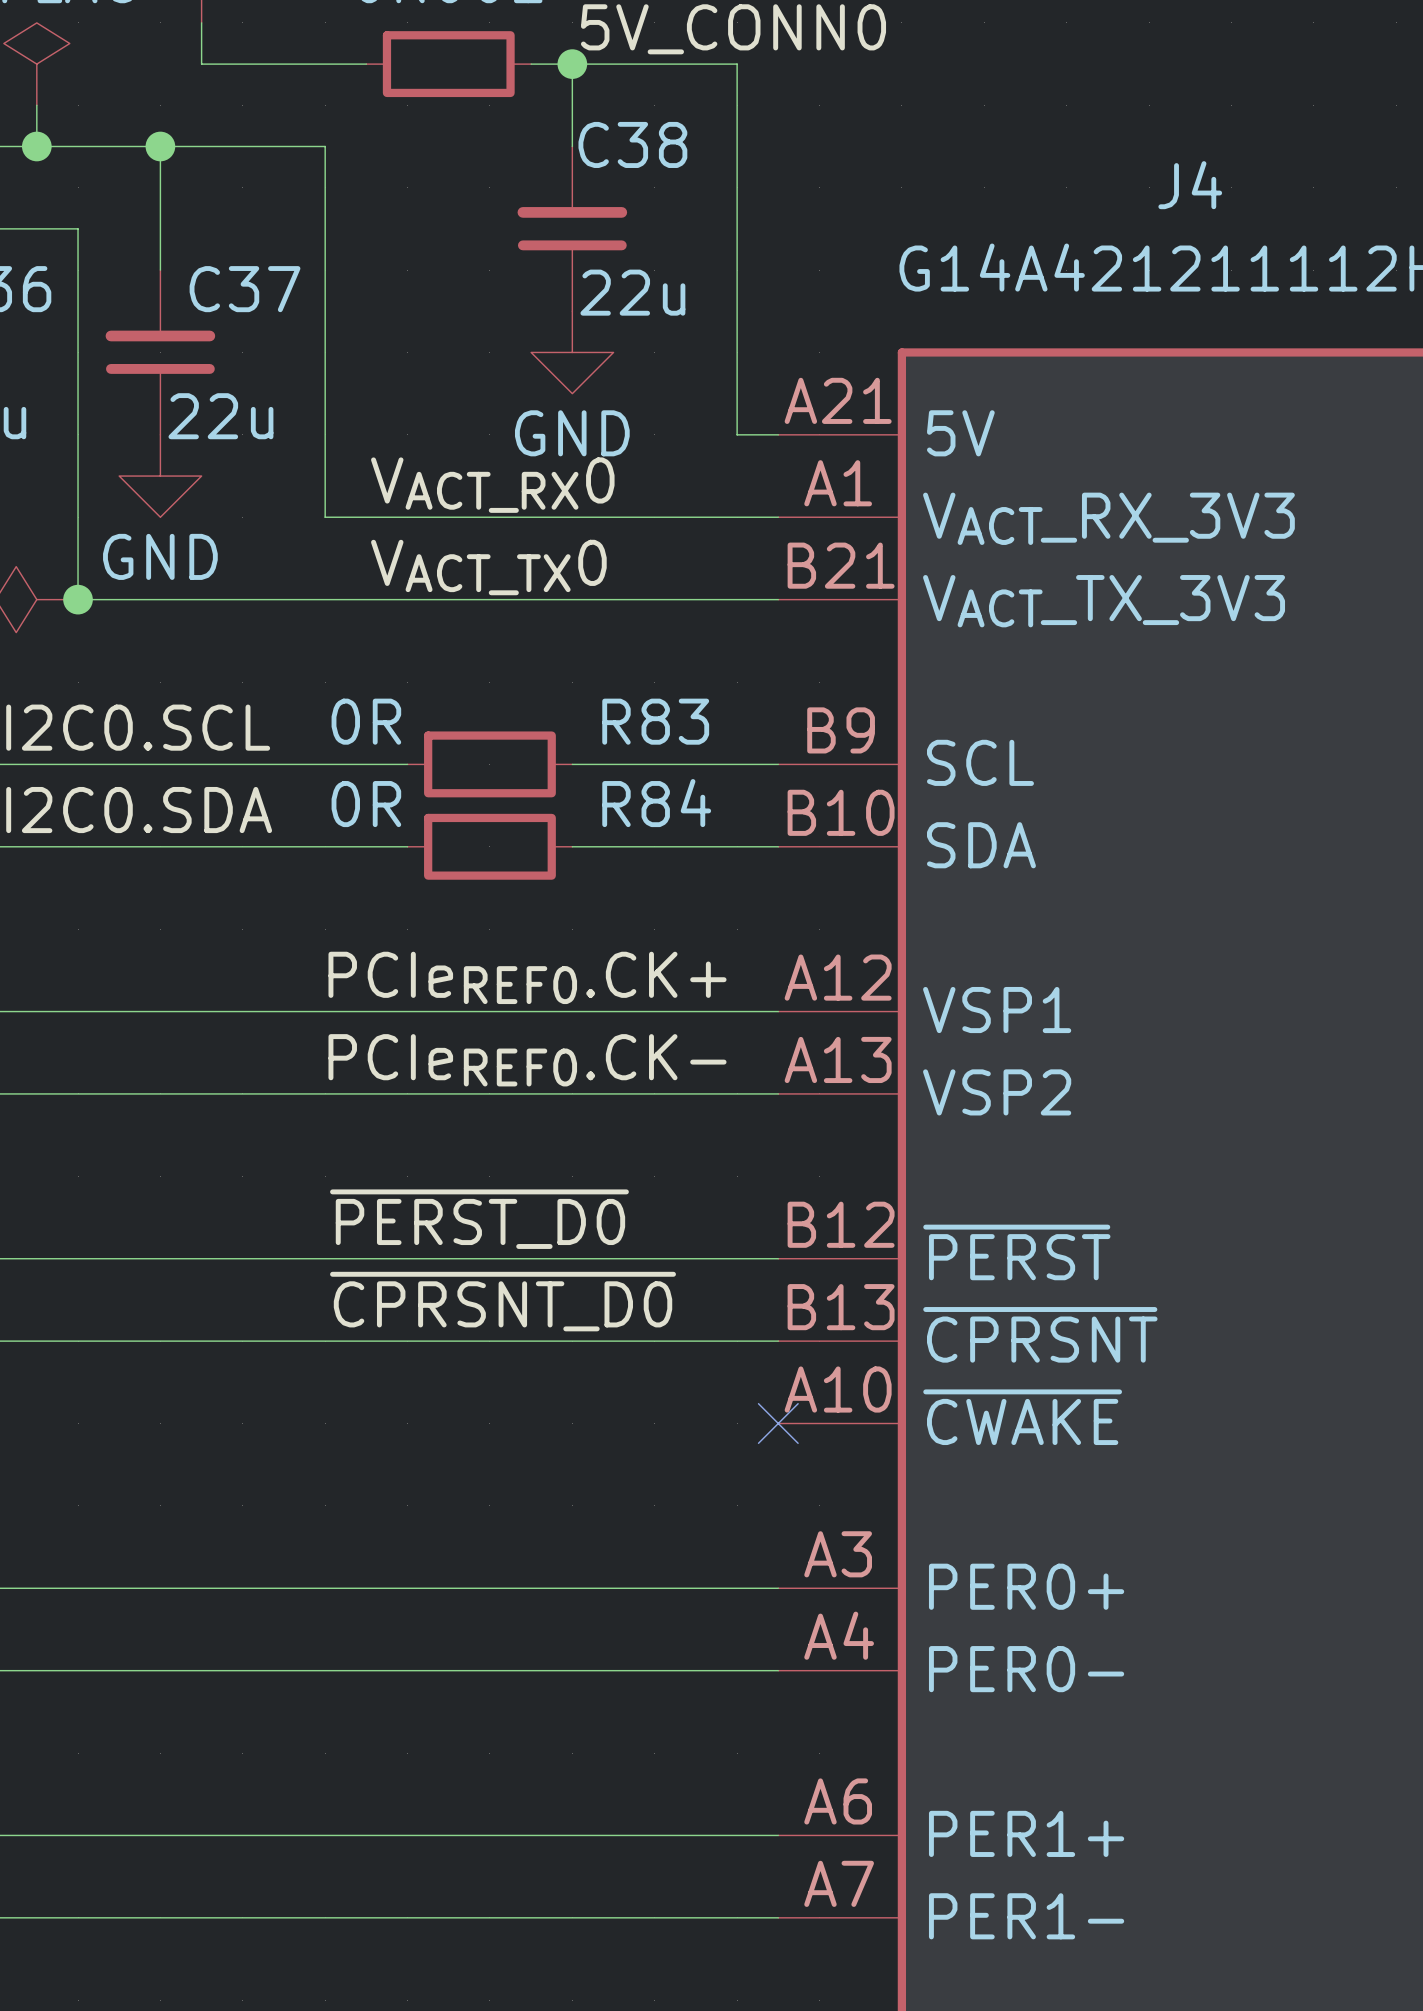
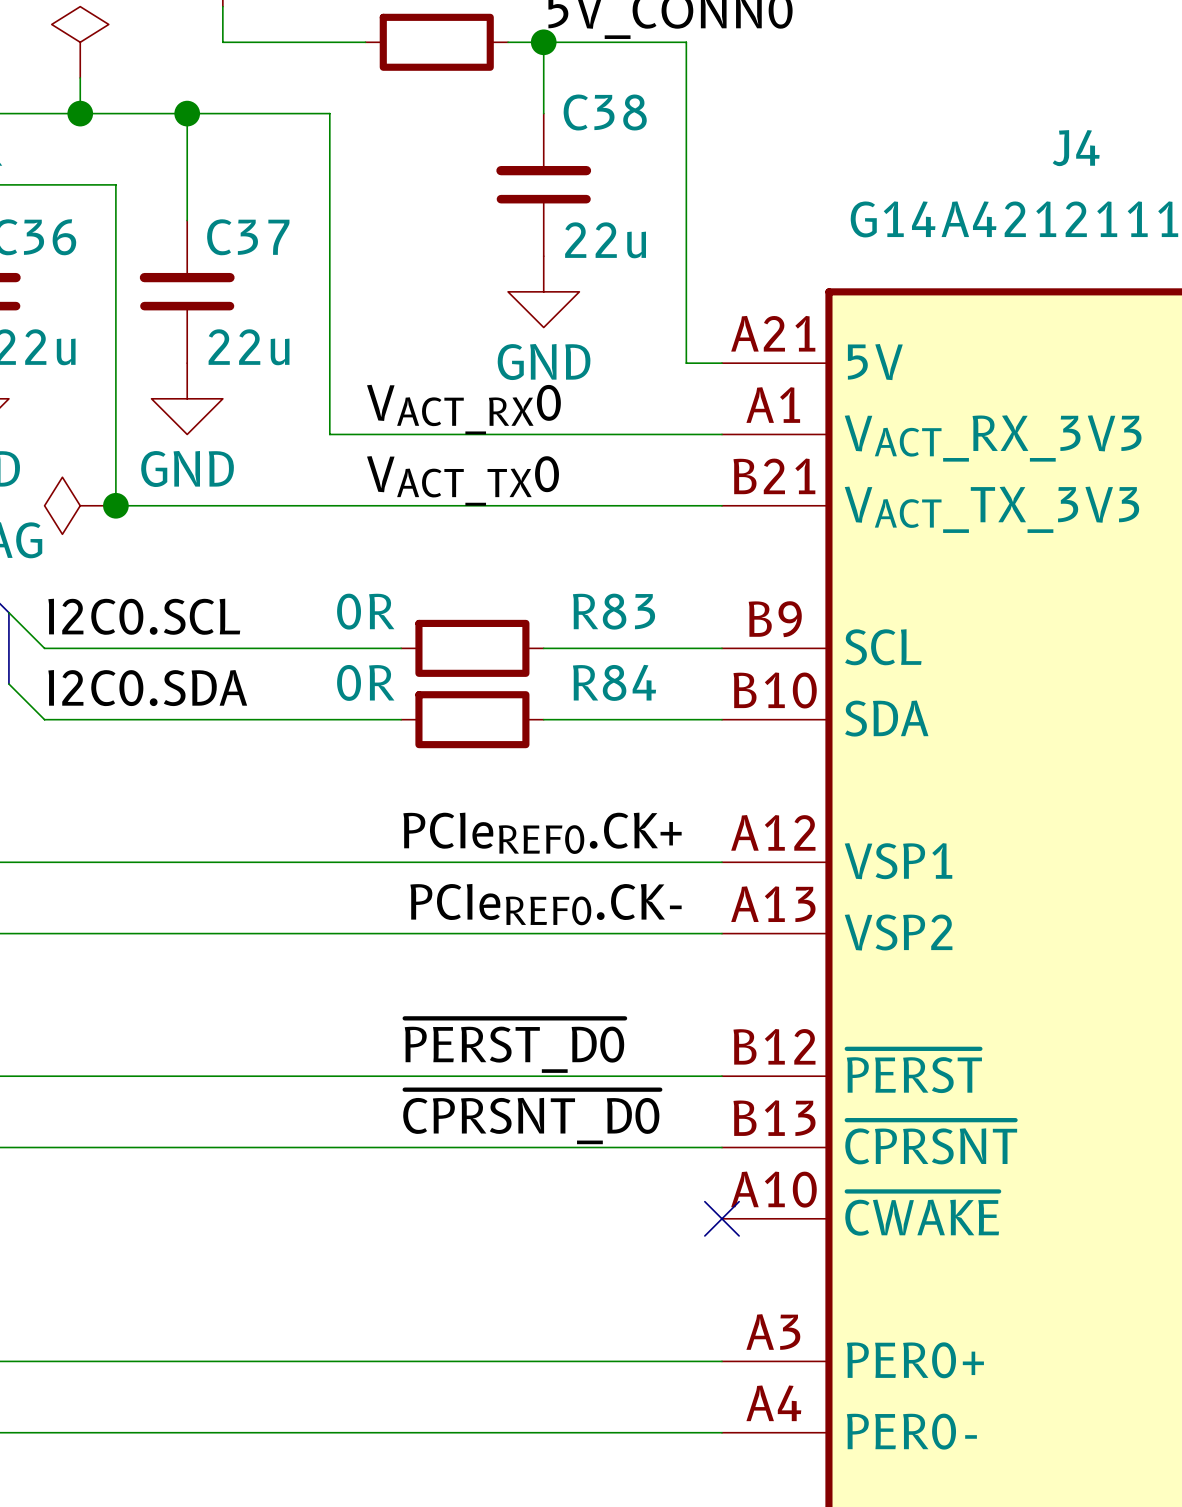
label position: ~{PERST_D0} (479, 1219) -> ~{PERST_D0} (514, 1045)
label position: ~{CPRSNT_D0} (503, 1301) -> ~{CPRSNT_D0} (531, 1116)

